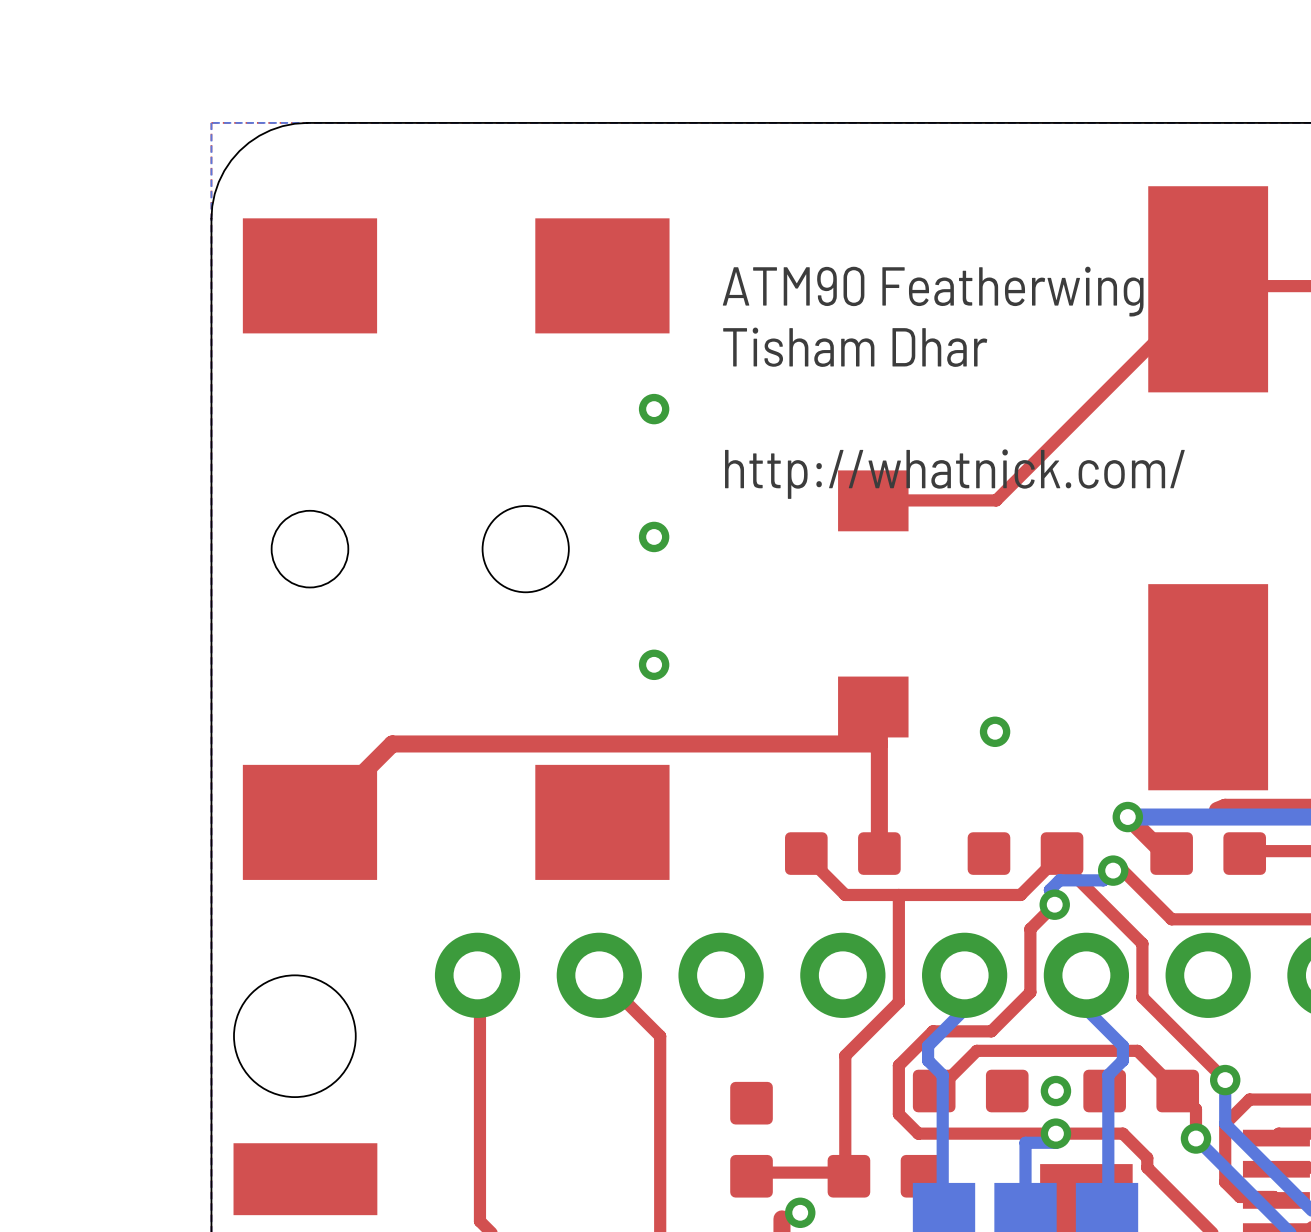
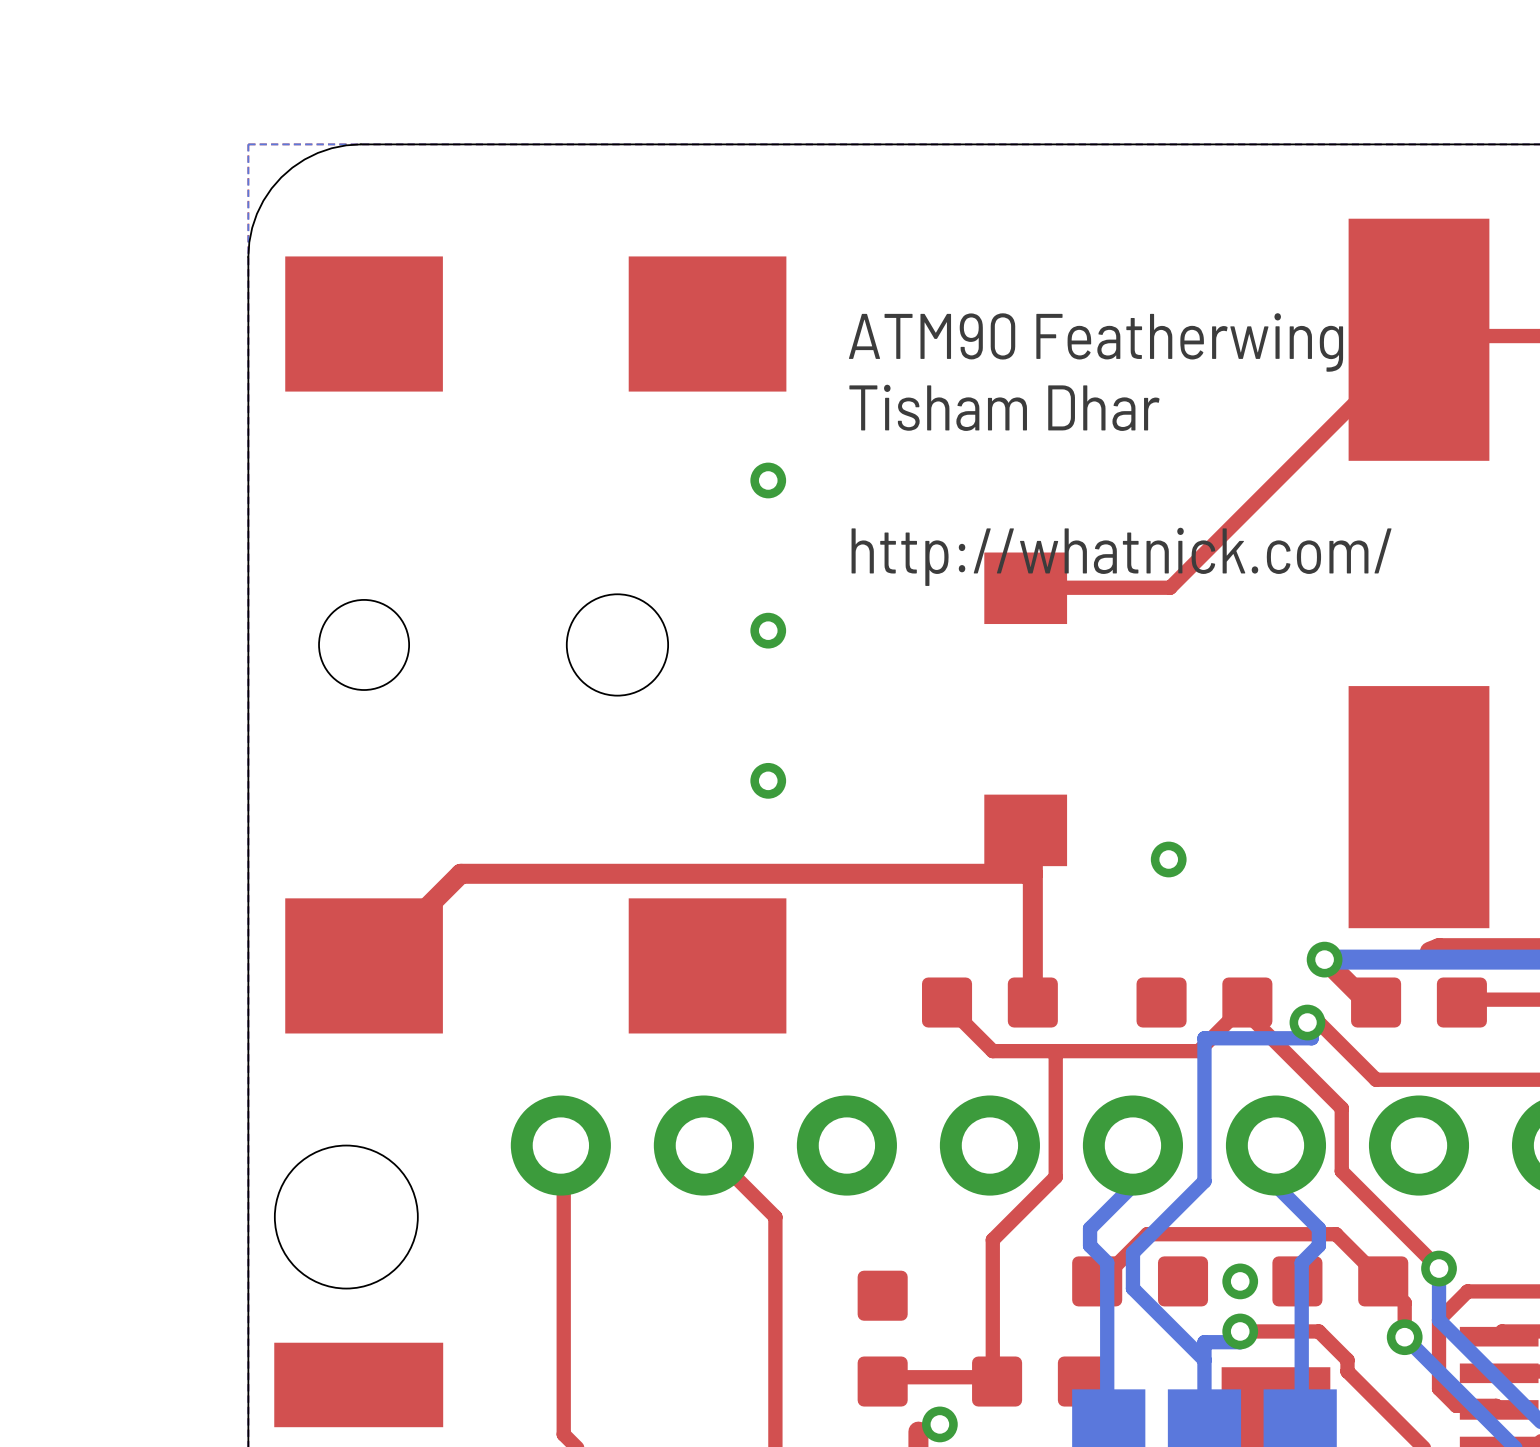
bottom track: (1113, 870) (1103, 880) (1059, 880) (1049, 890) (1054, 894) (1054, 904) -> (1307, 1022) (1311, 1038) (1204, 1038) (1204, 1181) (1132, 1252) (1132, 1288) (1204, 1360)
top track: (1054, 904) (1030, 929) (1030, 992) (991, 1031) (932, 1031) (898, 1065) (898, 1114) (918, 1133) (1055, 1133) -> none
via: (1054, 904) -> none

